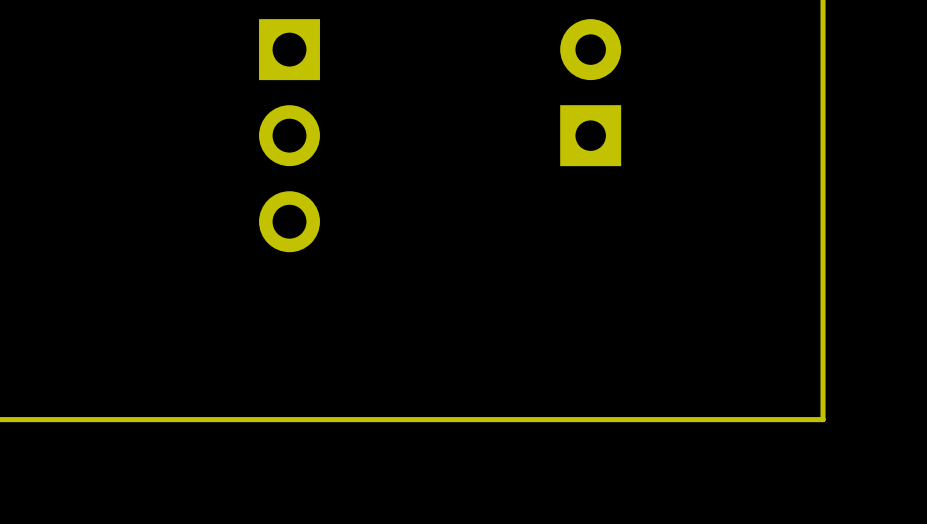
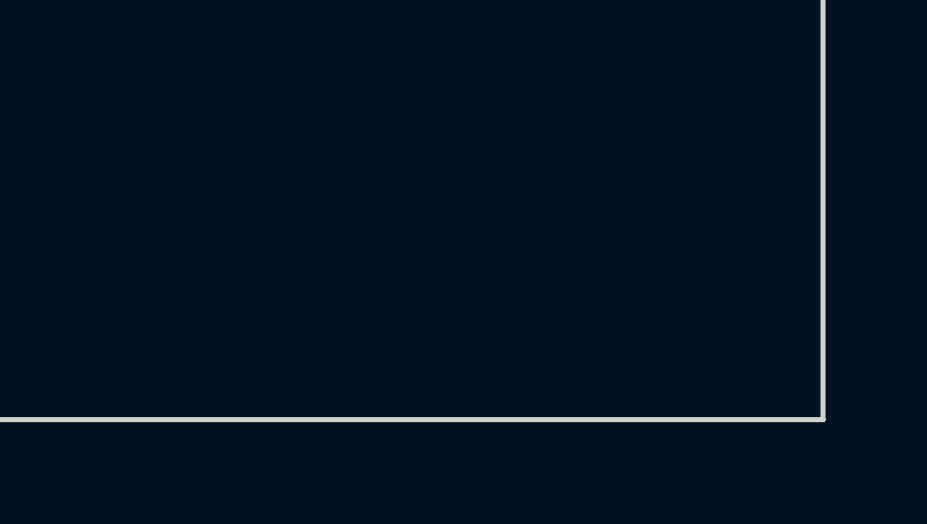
part: (590, 92) -> none
part: (289, 135) -> none

